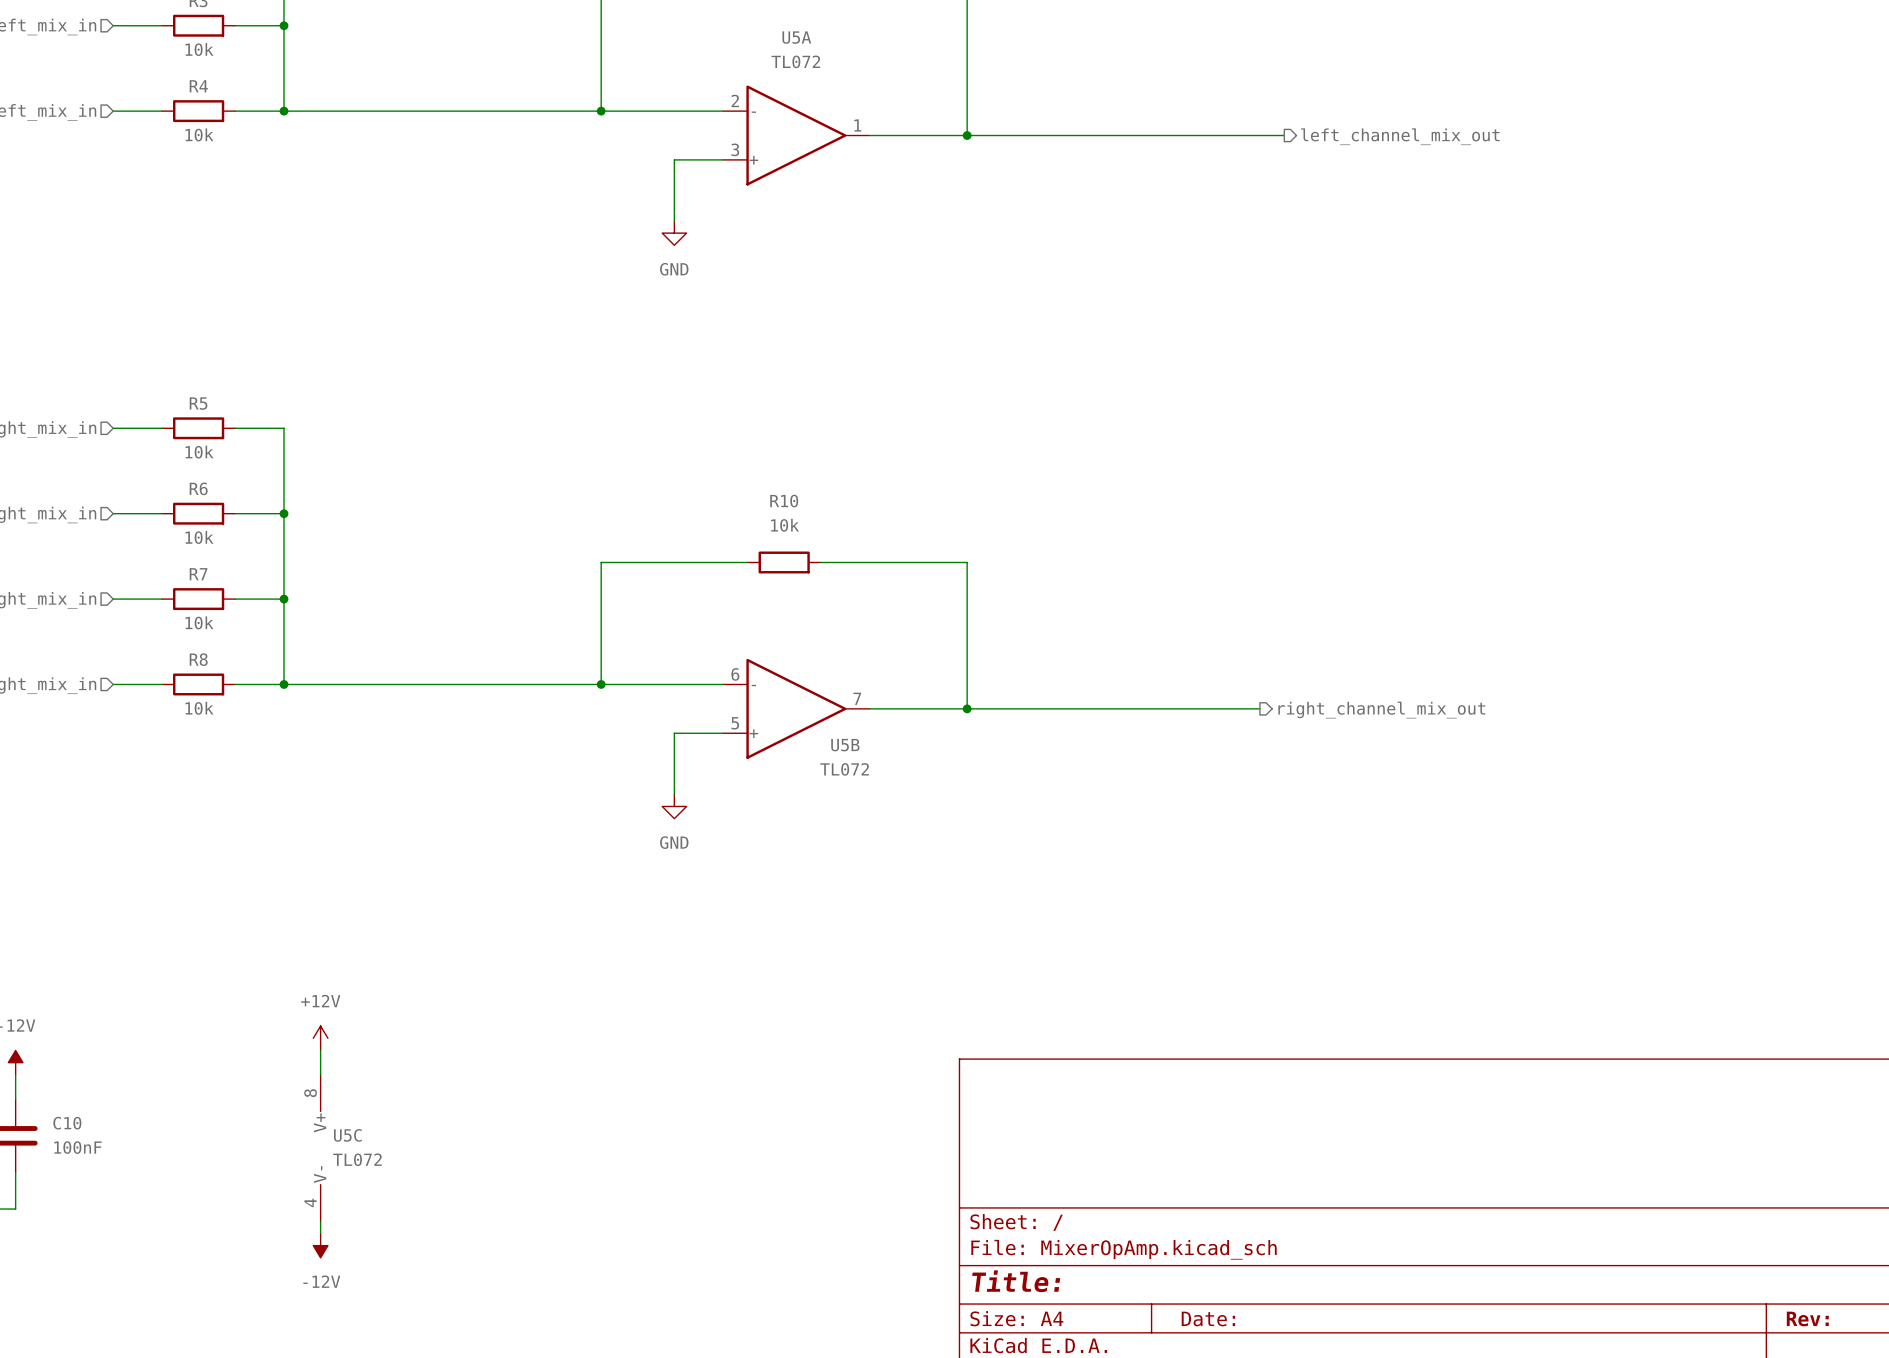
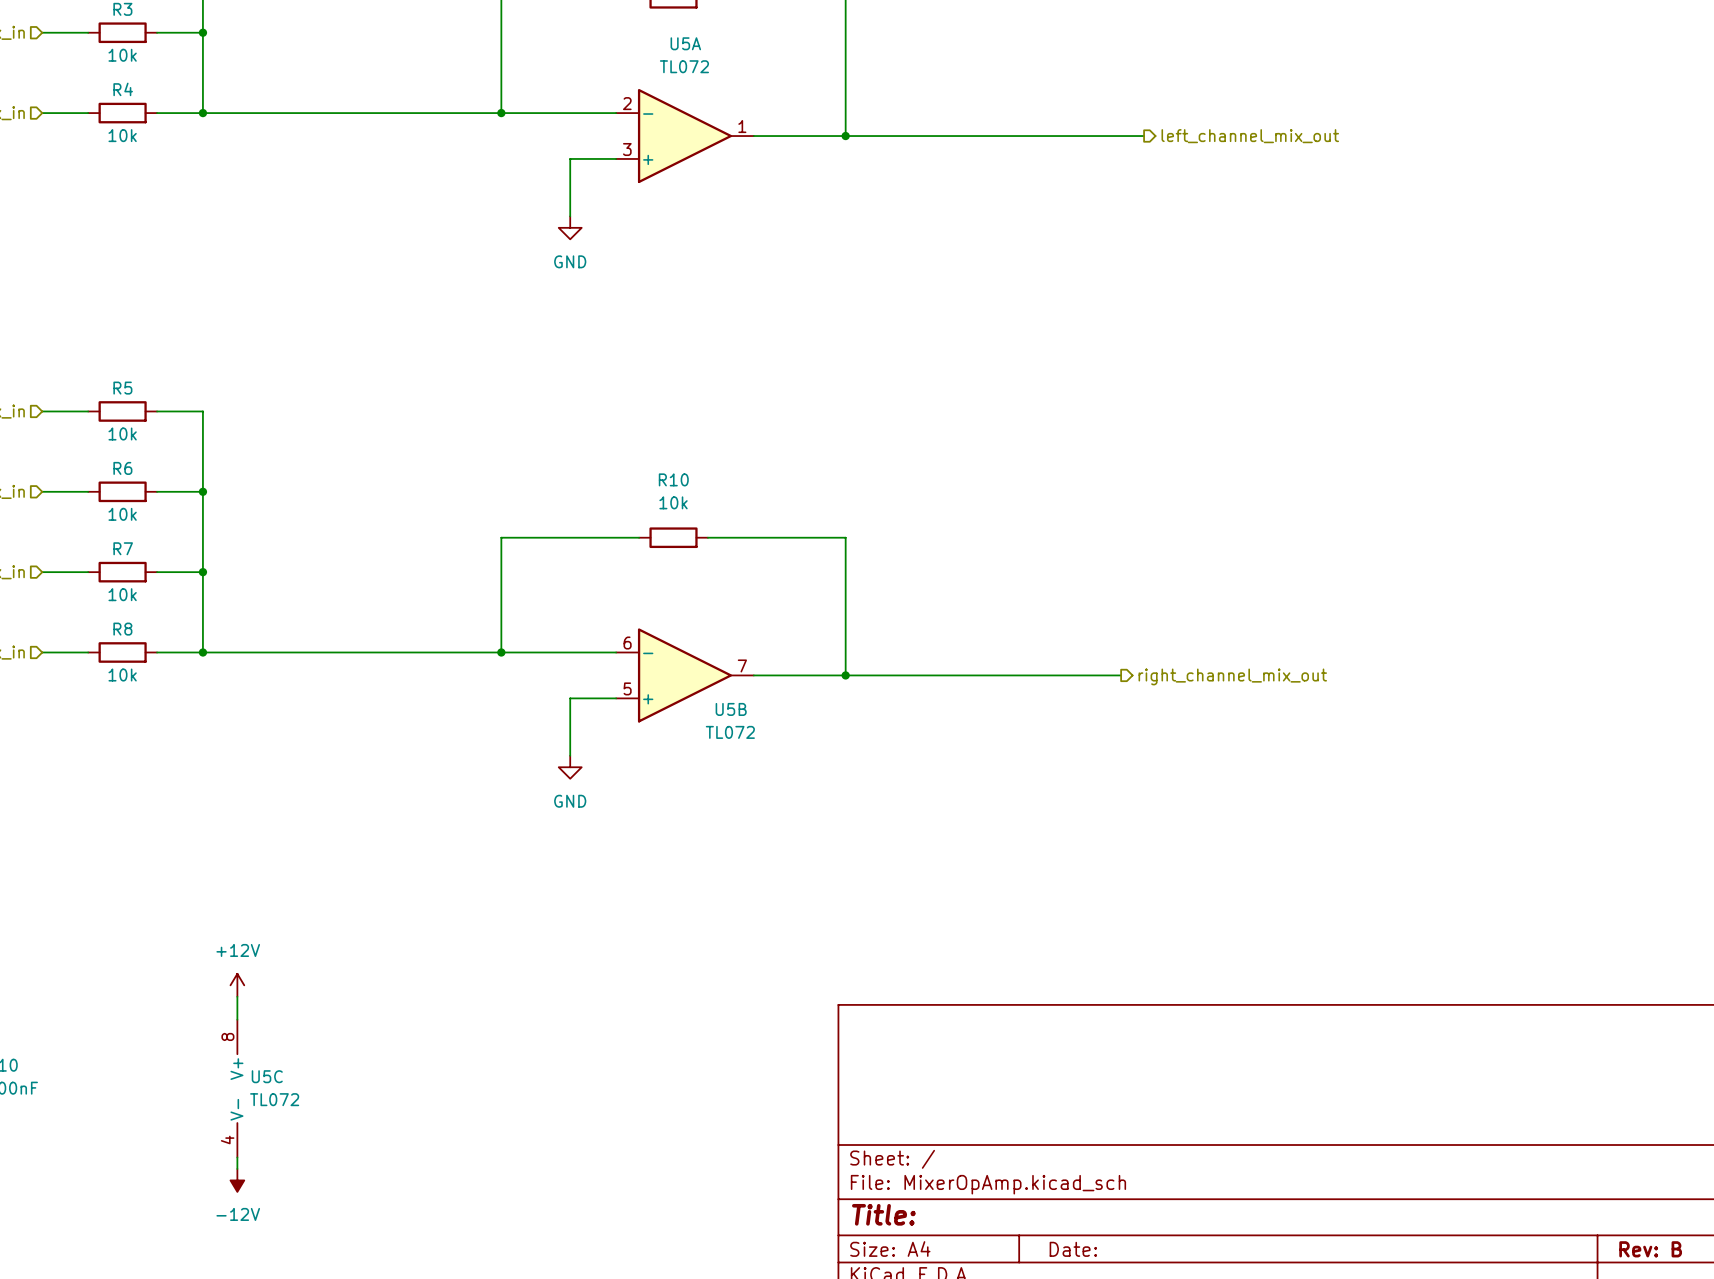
title block: Rev: (1807, 1318) -> Rev: B (1650, 1249)

